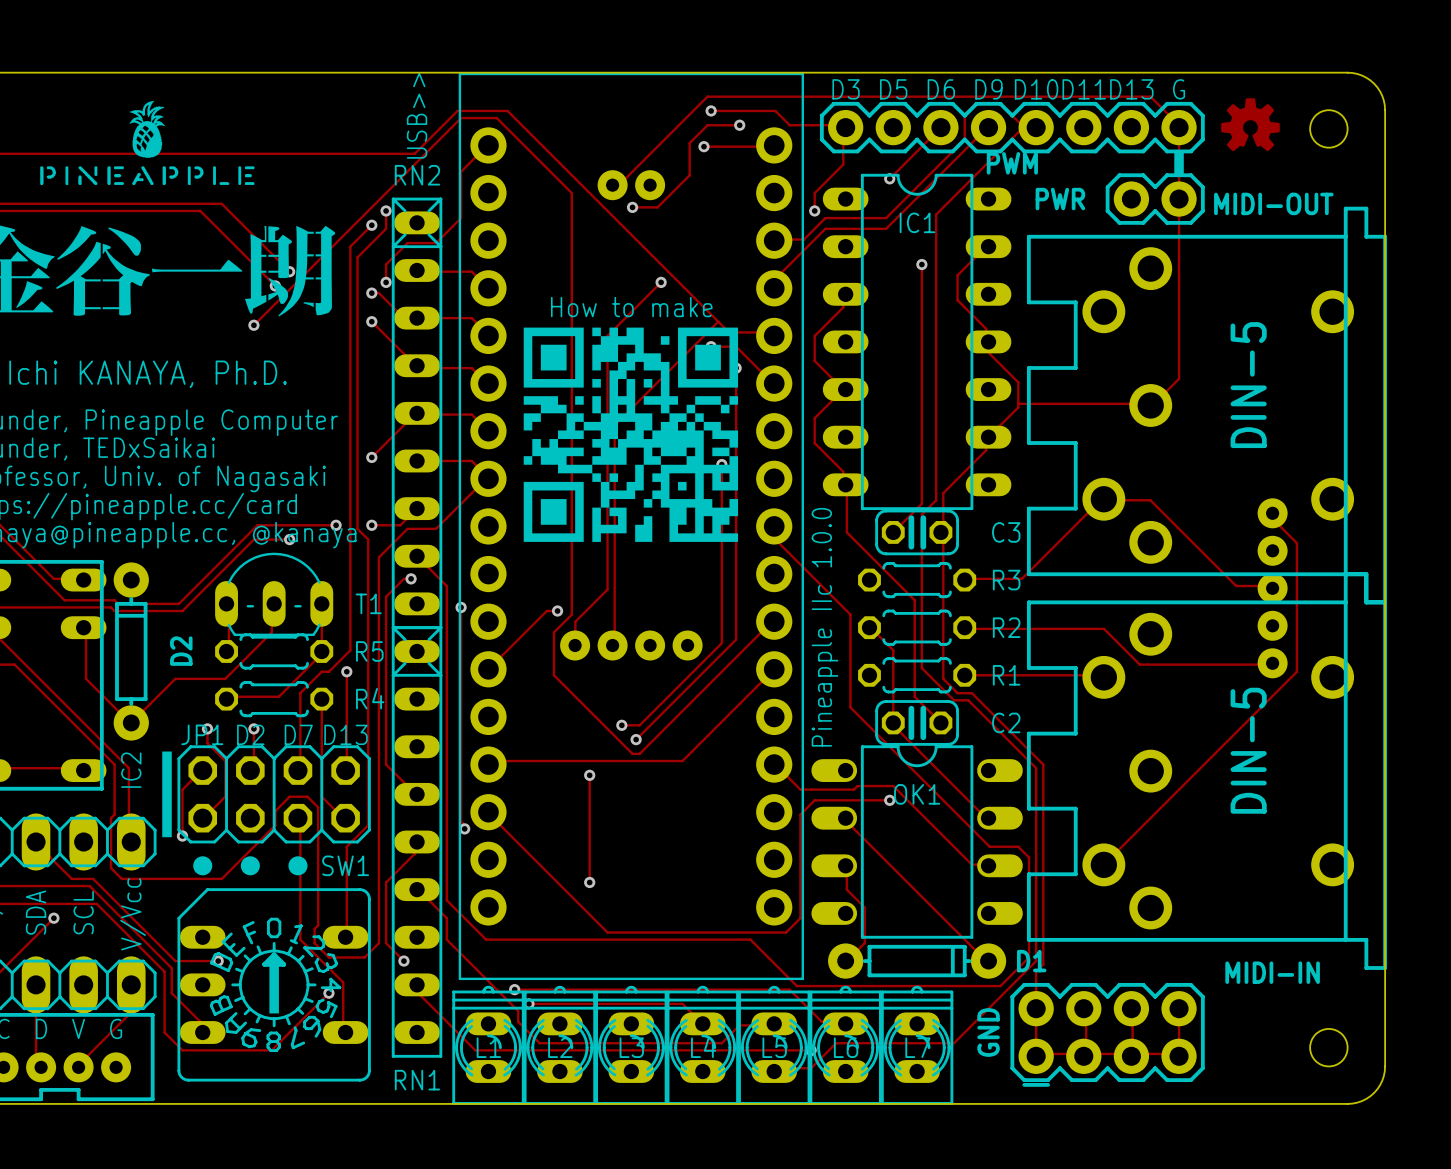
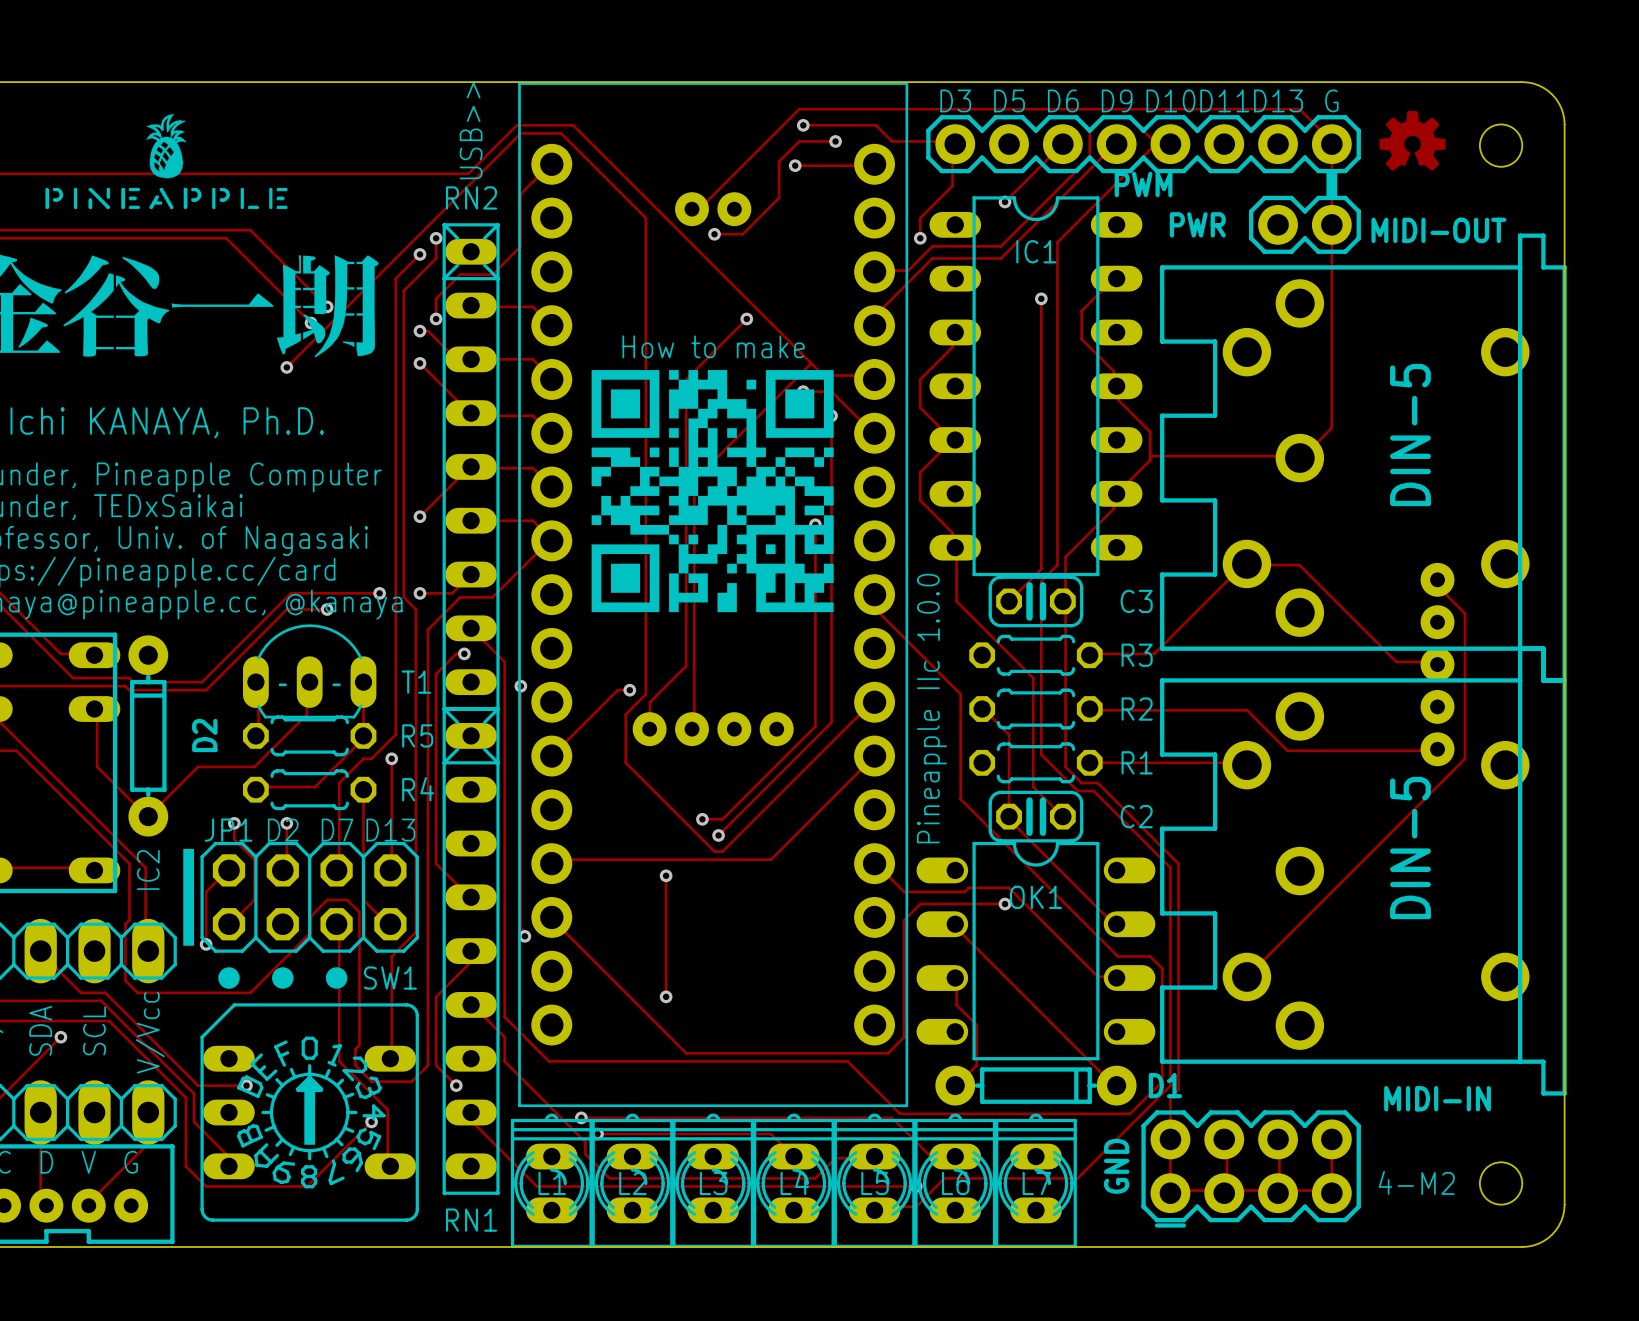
text: none -> 4-M2 (1416, 1182)

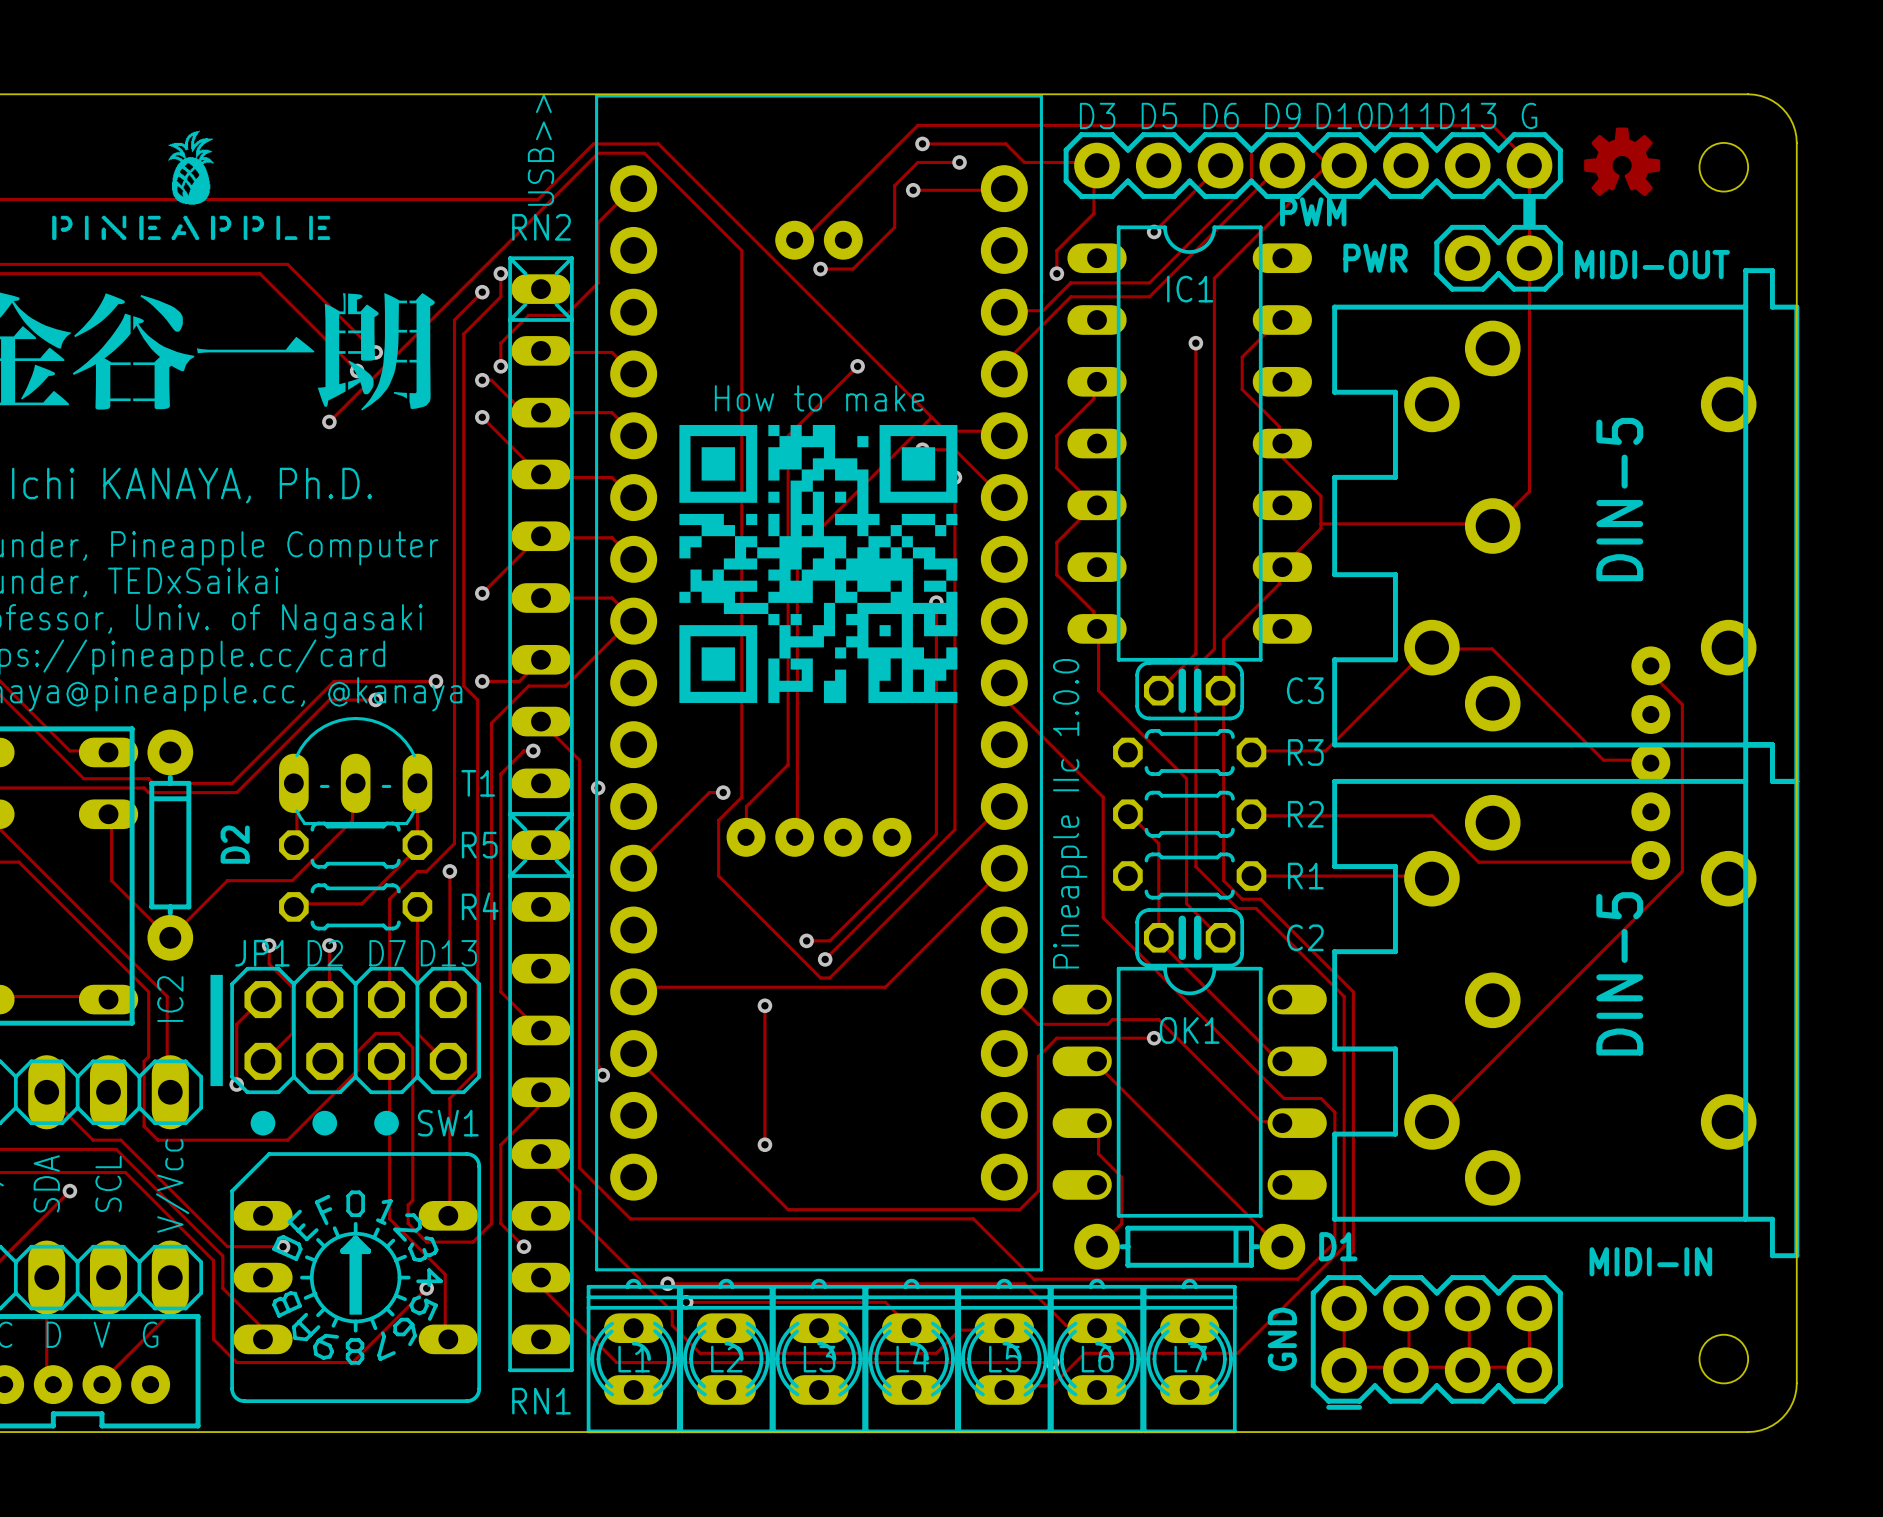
text: 4-M2 (1416, 1182) -> none

